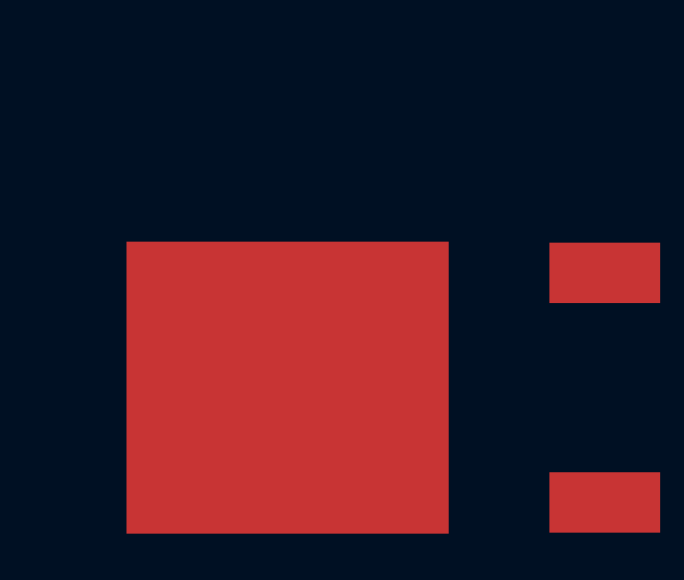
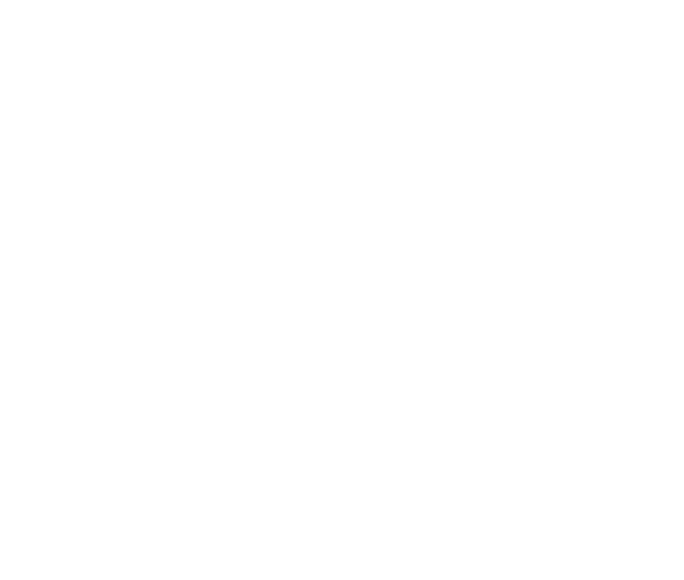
part: (393, 387) -> none

